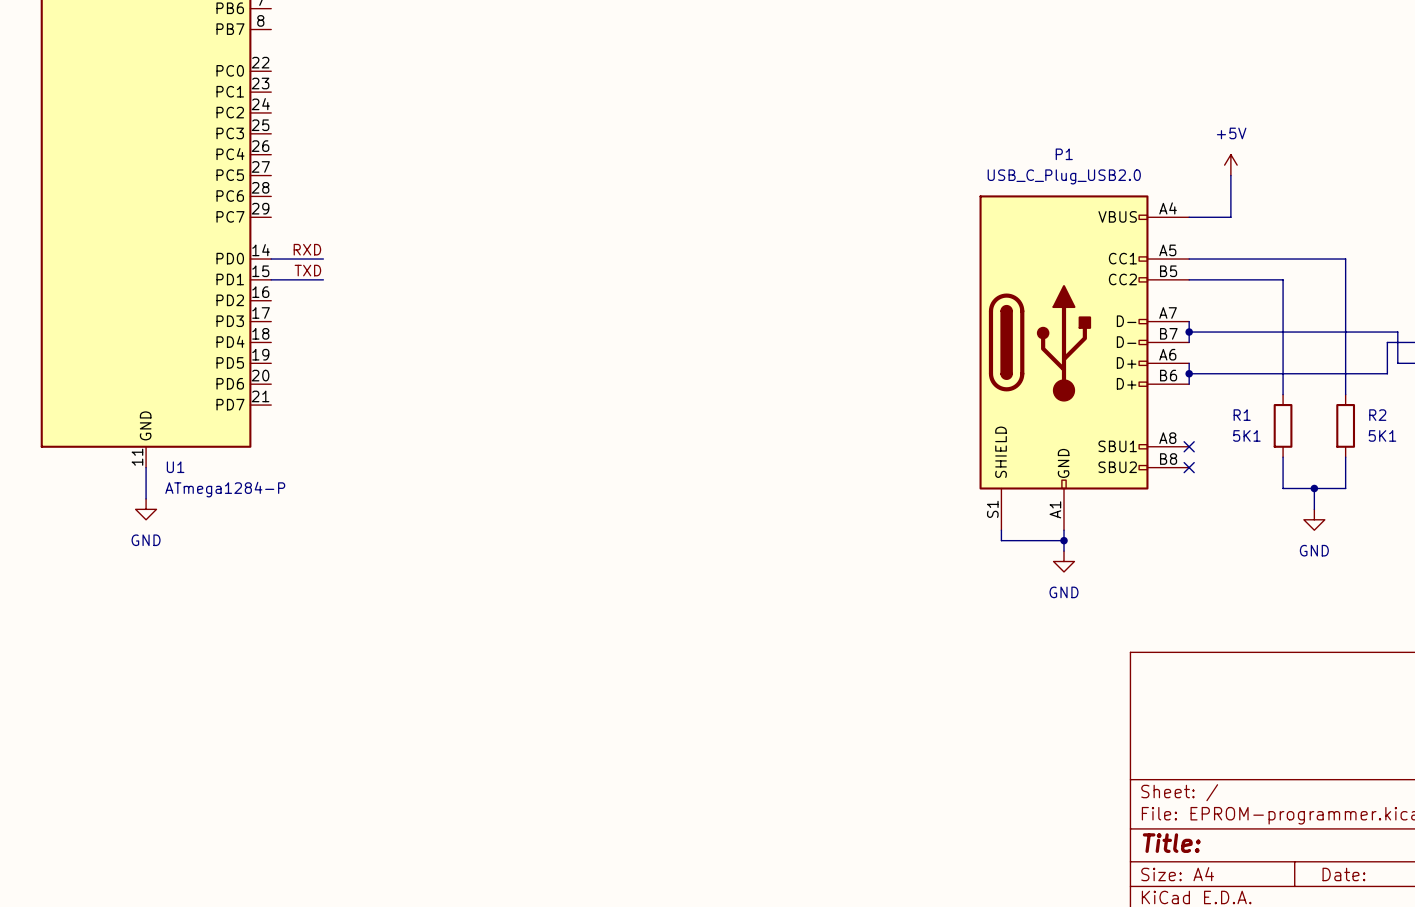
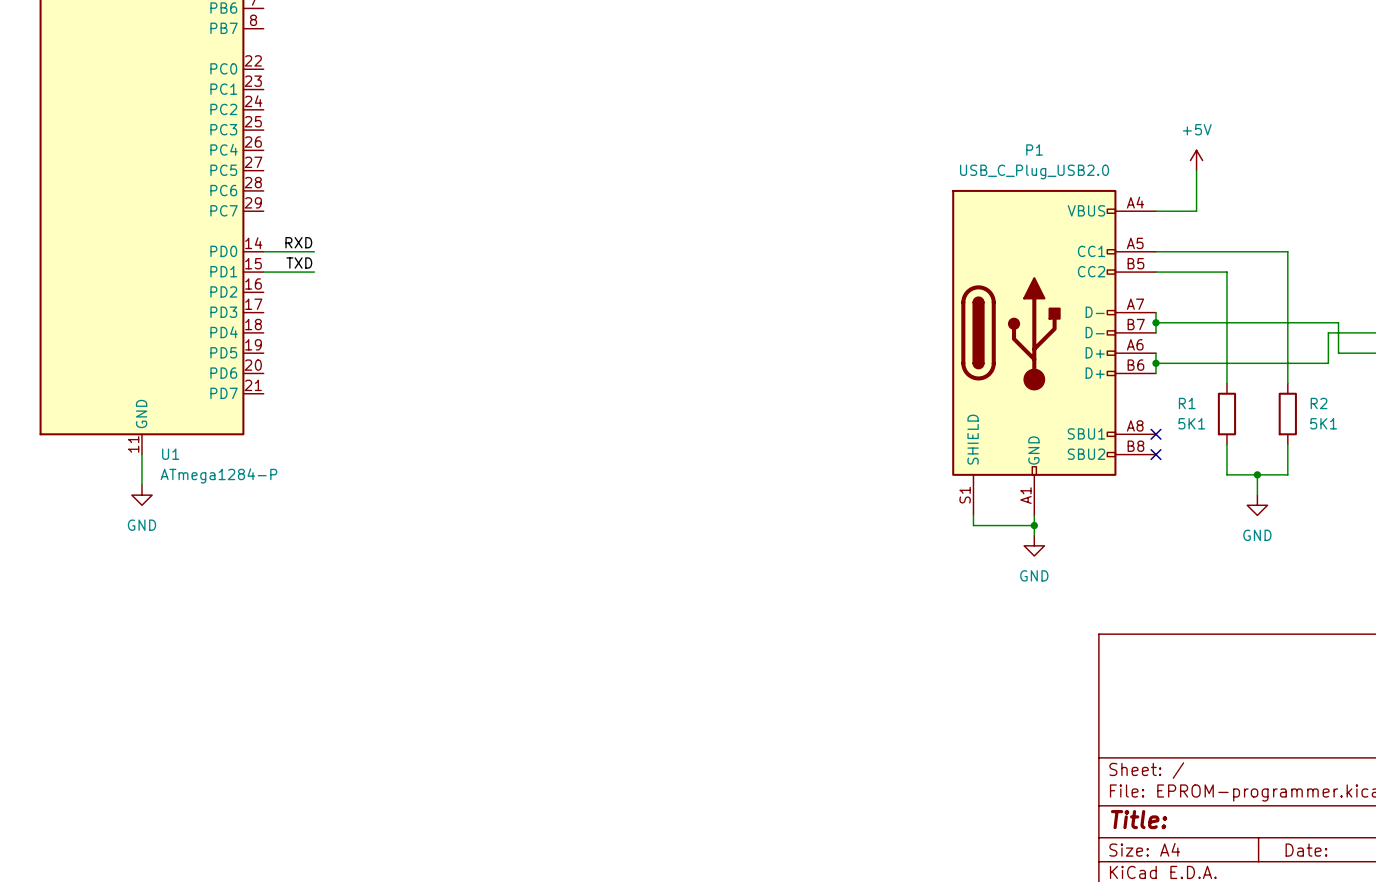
wire: (1324, 259) (1345, 259) (1345, 394) -> (1287, 251) (1287, 383)
wire: (1262, 279) (1283, 279) (1283, 394) -> (1226, 272) (1226, 383)
wire: (1376, 332) (1397, 332) (1397, 363) -> (1338, 322) (1338, 353) (1358, 353)
wire: (1387, 342) (1387, 373) (1366, 373) -> (1348, 332) (1328, 332) (1328, 363)
R1 position: (1283, 425) -> (1226, 414)
R2 position: (1345, 425) -> (1287, 414)
wire: (1283, 457) (1283, 488) -> (1226, 444) (1226, 474) (1247, 474)
wire: (1345, 457) (1345, 488) (1324, 488) -> (1287, 444) (1287, 474)
wire: (1314, 488) (1314, 509) -> (1257, 474) (1257, 495)
junction position: (1314, 488) -> (1257, 474)
power symbol position: GND (1314, 519) -> GND (1257, 505)

